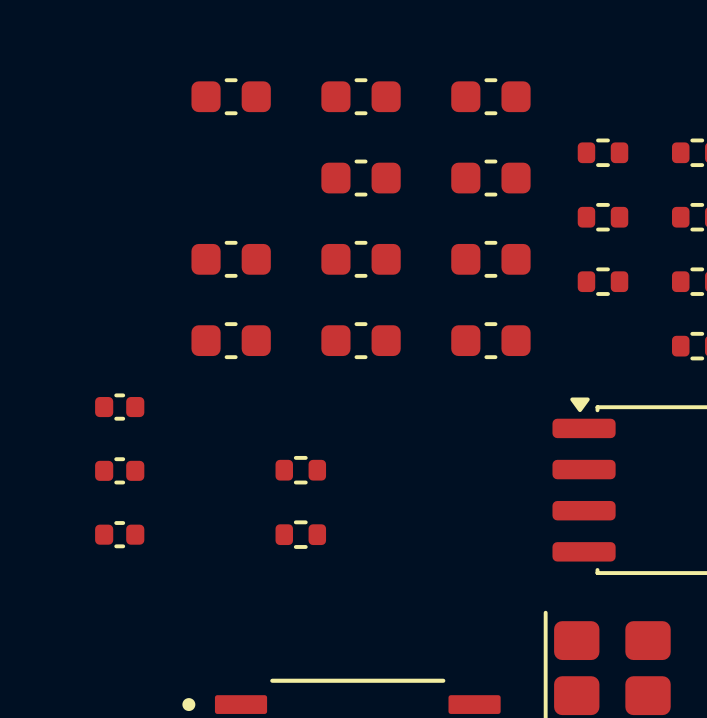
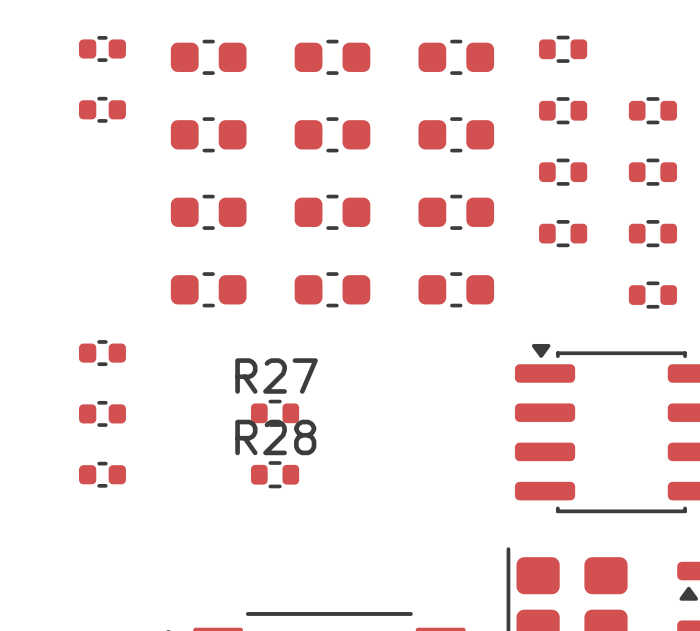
part: none -> (102, 48)
part: none -> (563, 49)
part: none -> (102, 109)
part: none -> (208, 134)
R27 name: none -> R27 (276, 376)
R28 name: none -> R28 (275, 437)

